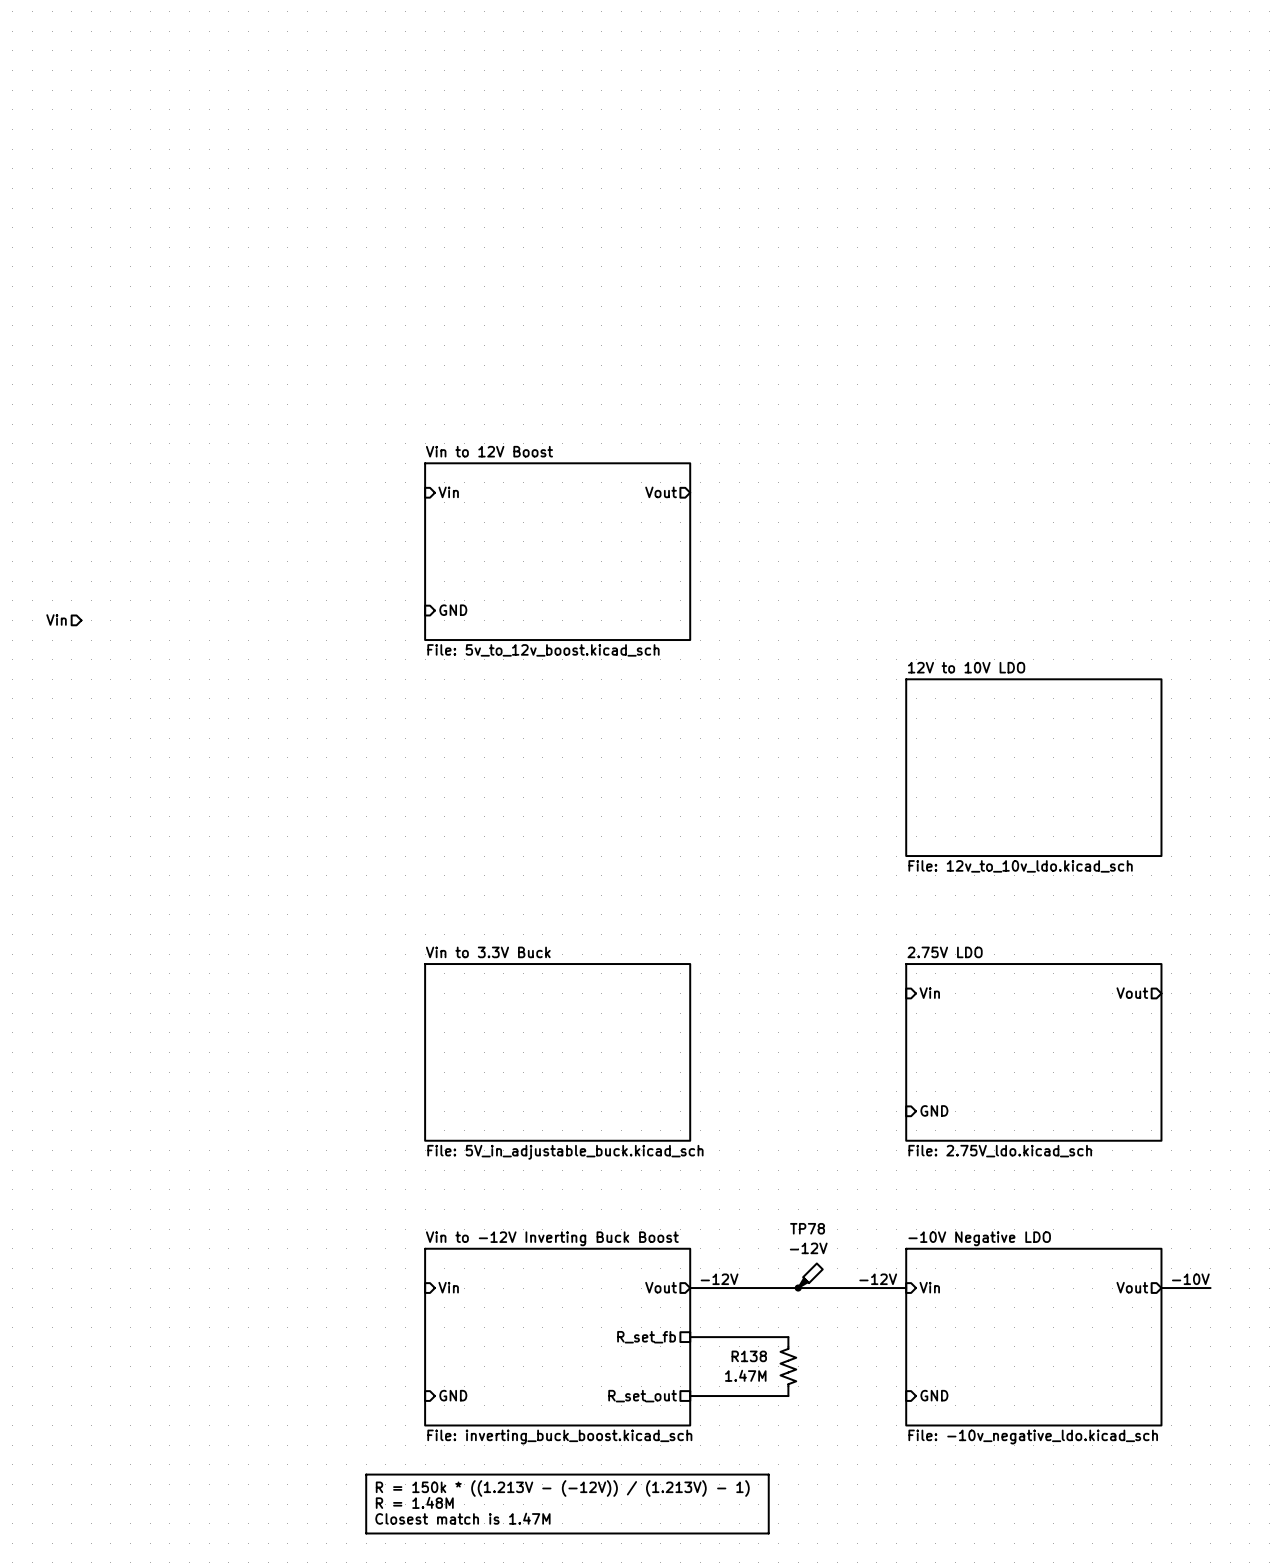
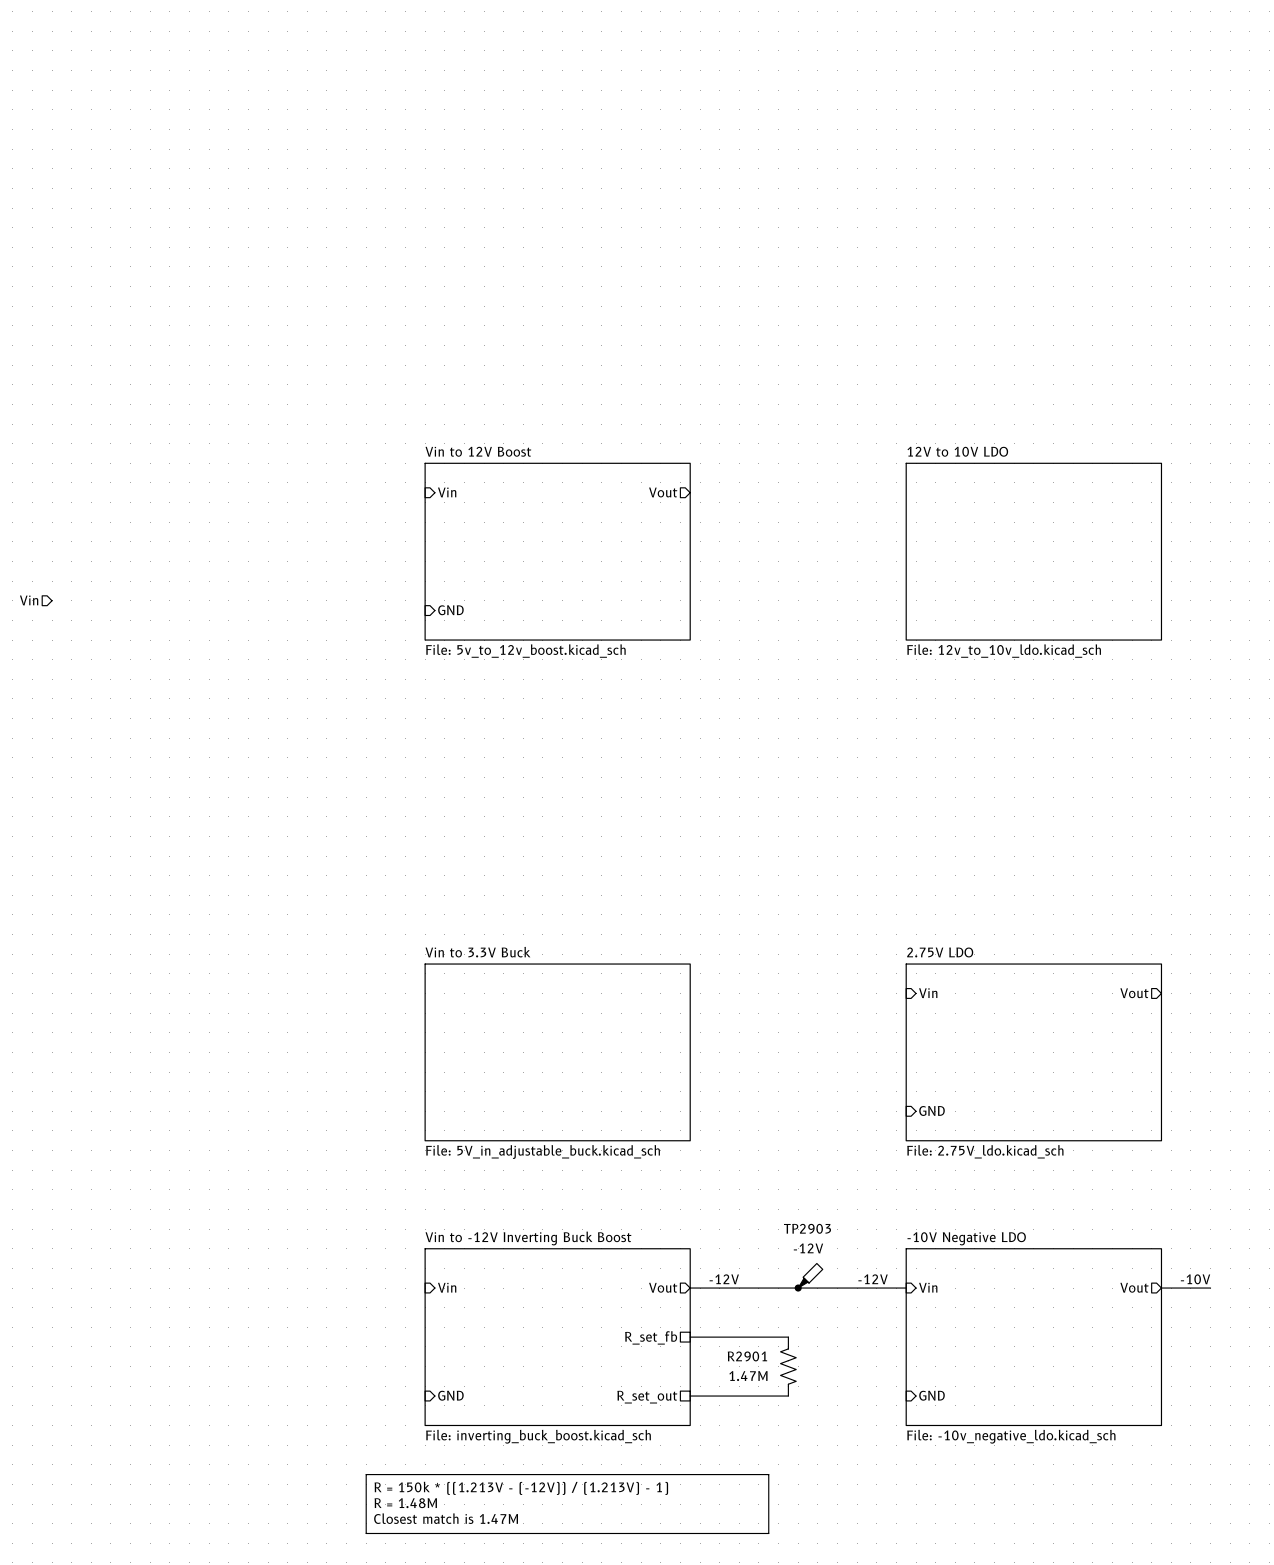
hierarchical label position: Vin (56, 620) -> Vin (29, 600)
sheet 12V to 10V LDO position: (1033, 767) -> (1033, 551)
TP78 name: TP78 (807, 1228) -> TP2903 (807, 1228)
R138 name: R138 (749, 1356) -> R2901 (747, 1356)

